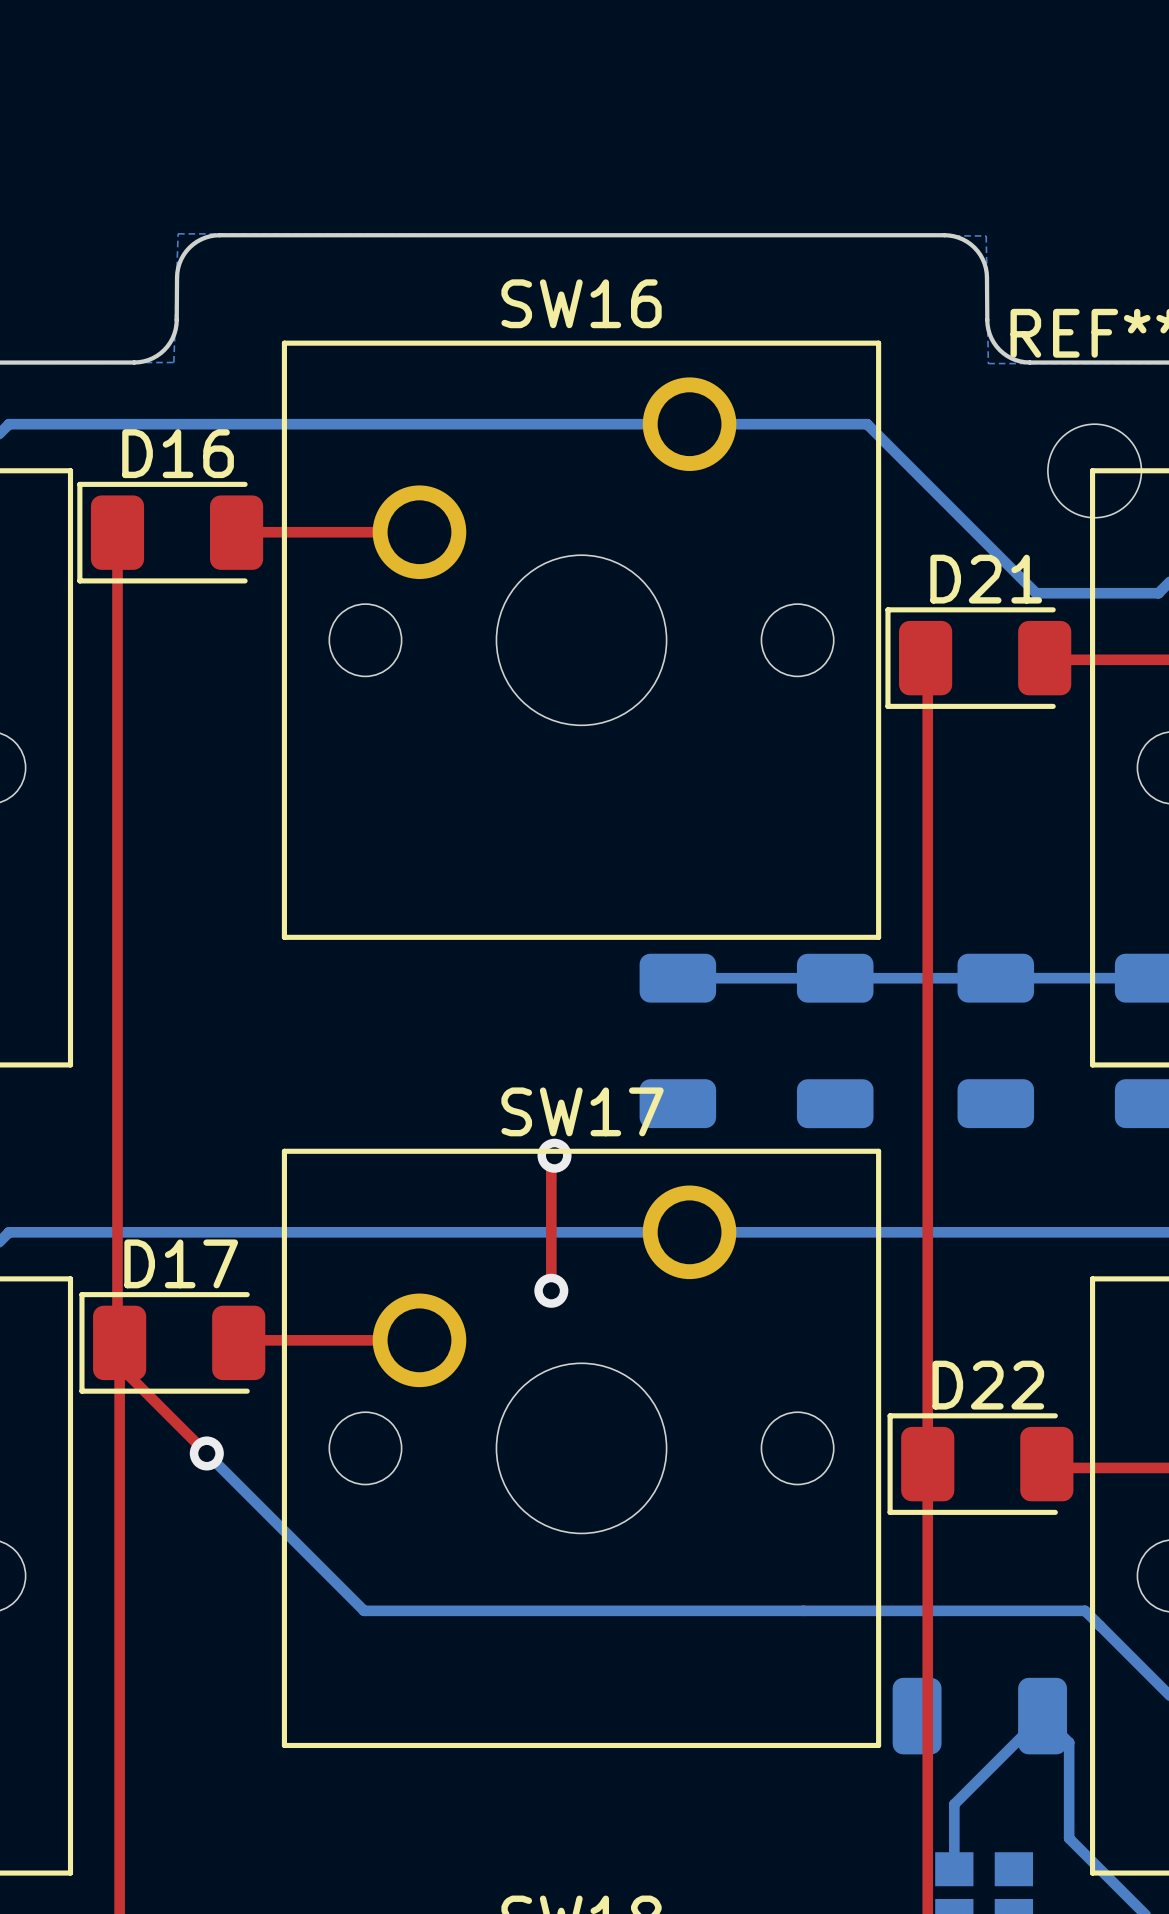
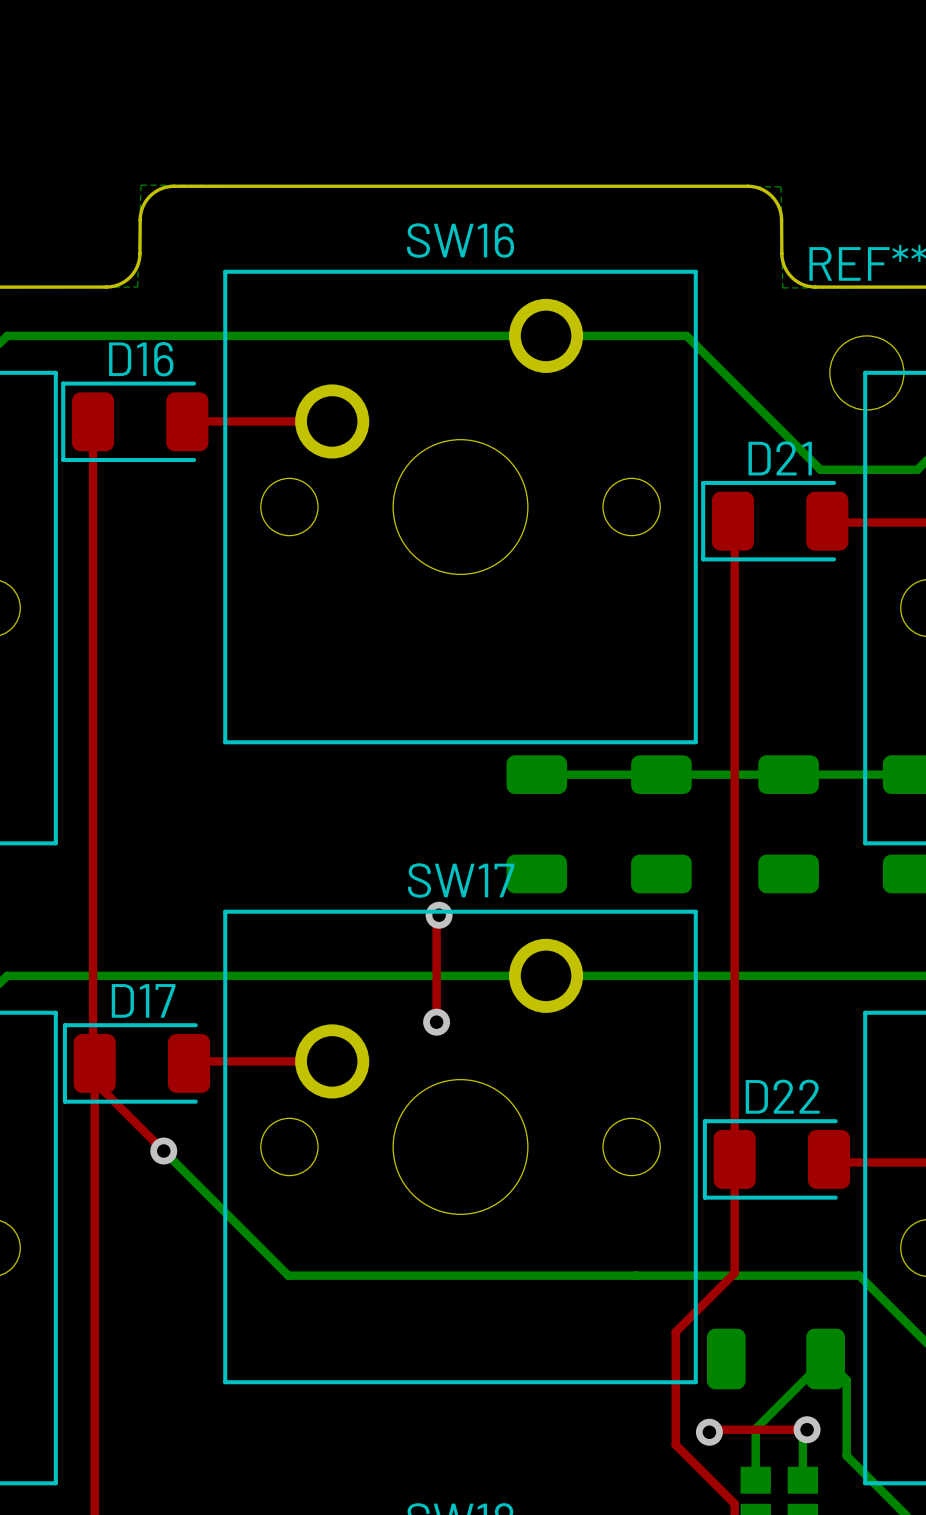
top track: (927, 1607) (927, 1899) -> (734, 1273) (675, 1332) (675, 1444) (734, 1503)
bottom track: none -> (807, 1429) (802, 1433) (802, 1480)
top track: none -> (807, 1429) (711, 1429) (709, 1432)
via: none -> (807, 1429)
via: none -> (709, 1432)

